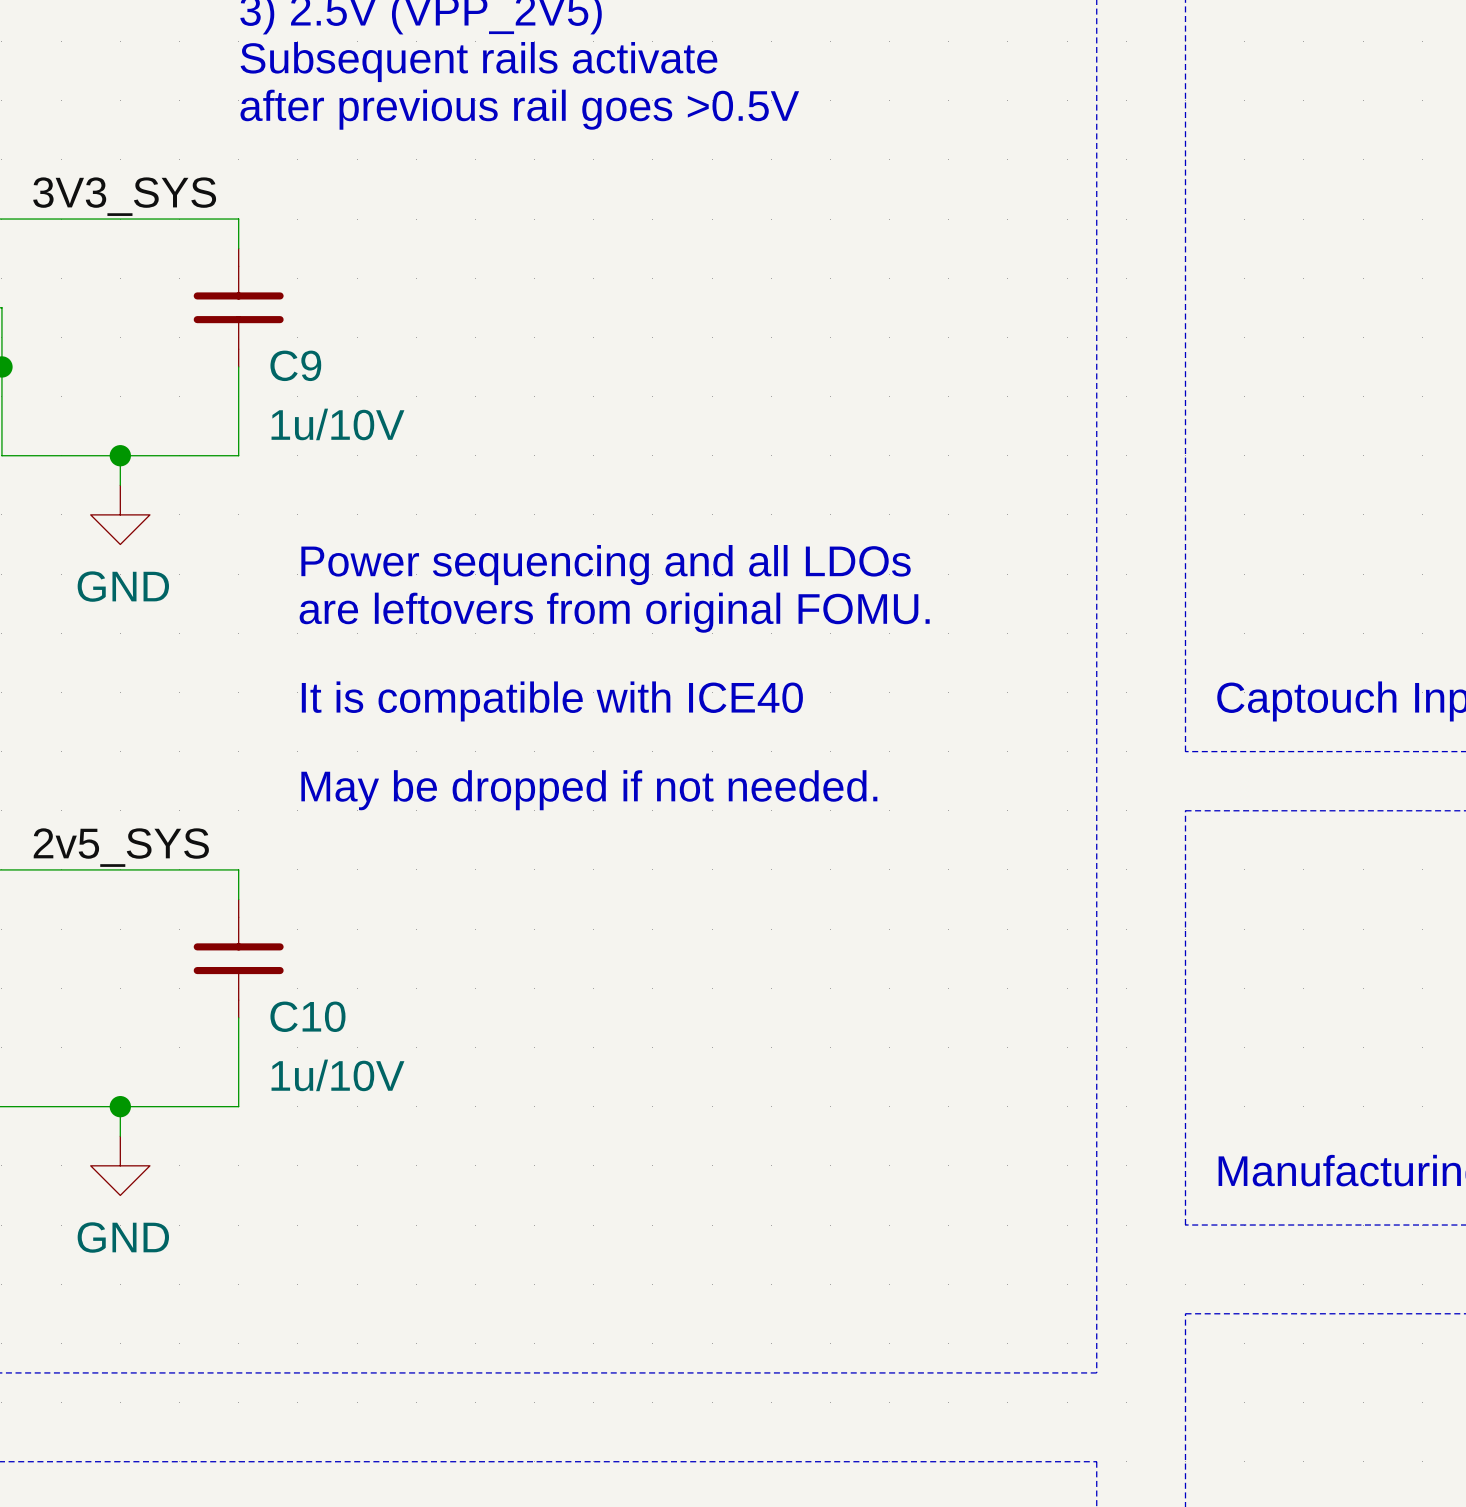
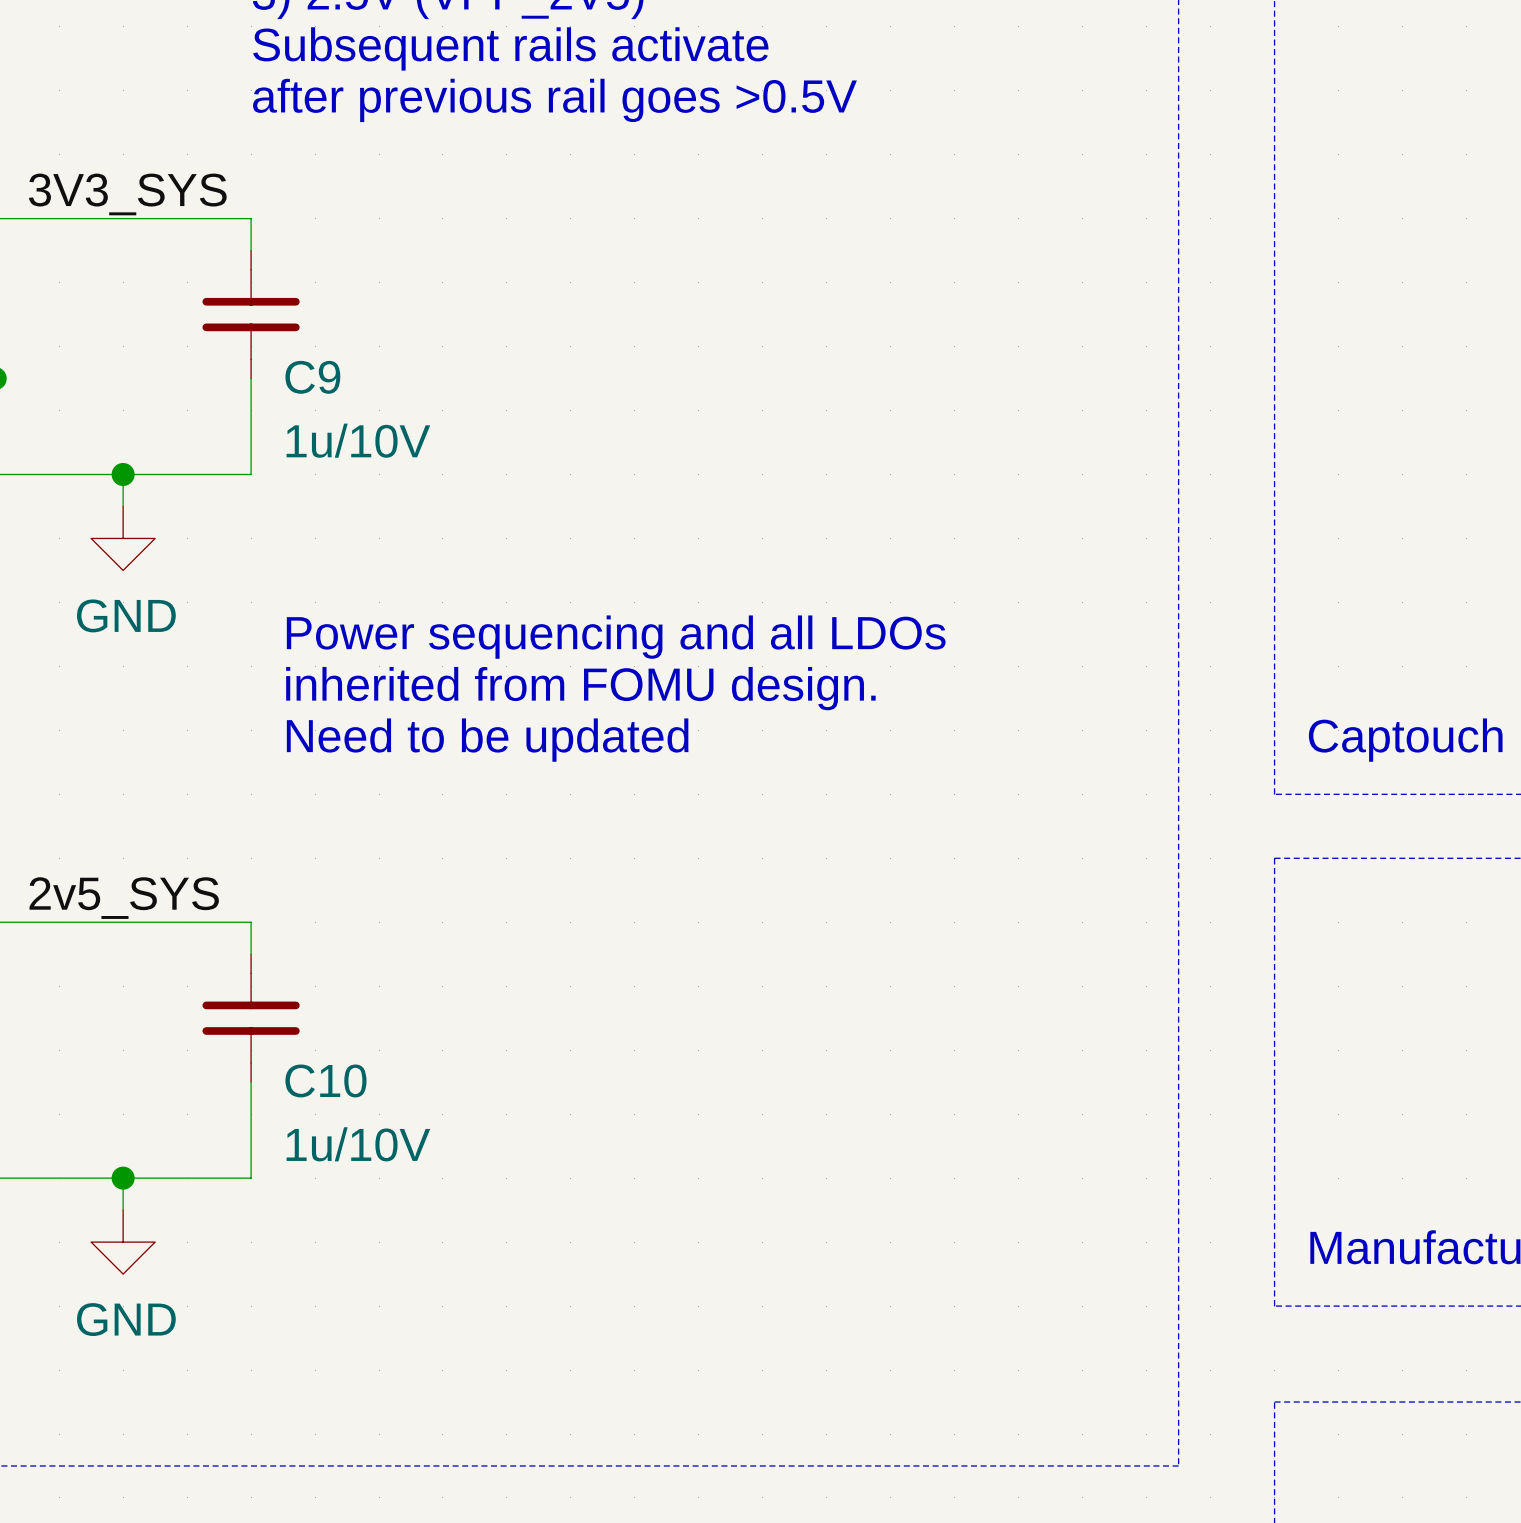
text position: Power sequencing and all LDOs (606, 565) -> Power sequencing and all LDOs (616, 637)
text: are leftovers from original FOMU. (614, 612) -> none
text: none -> inherited from FOMU design. (580, 688)
text: none -> Need to be updated (487, 740)
text: It is compatible with ICE40 (552, 701) -> none
text: May be dropped if not needed. (589, 790) -> none

